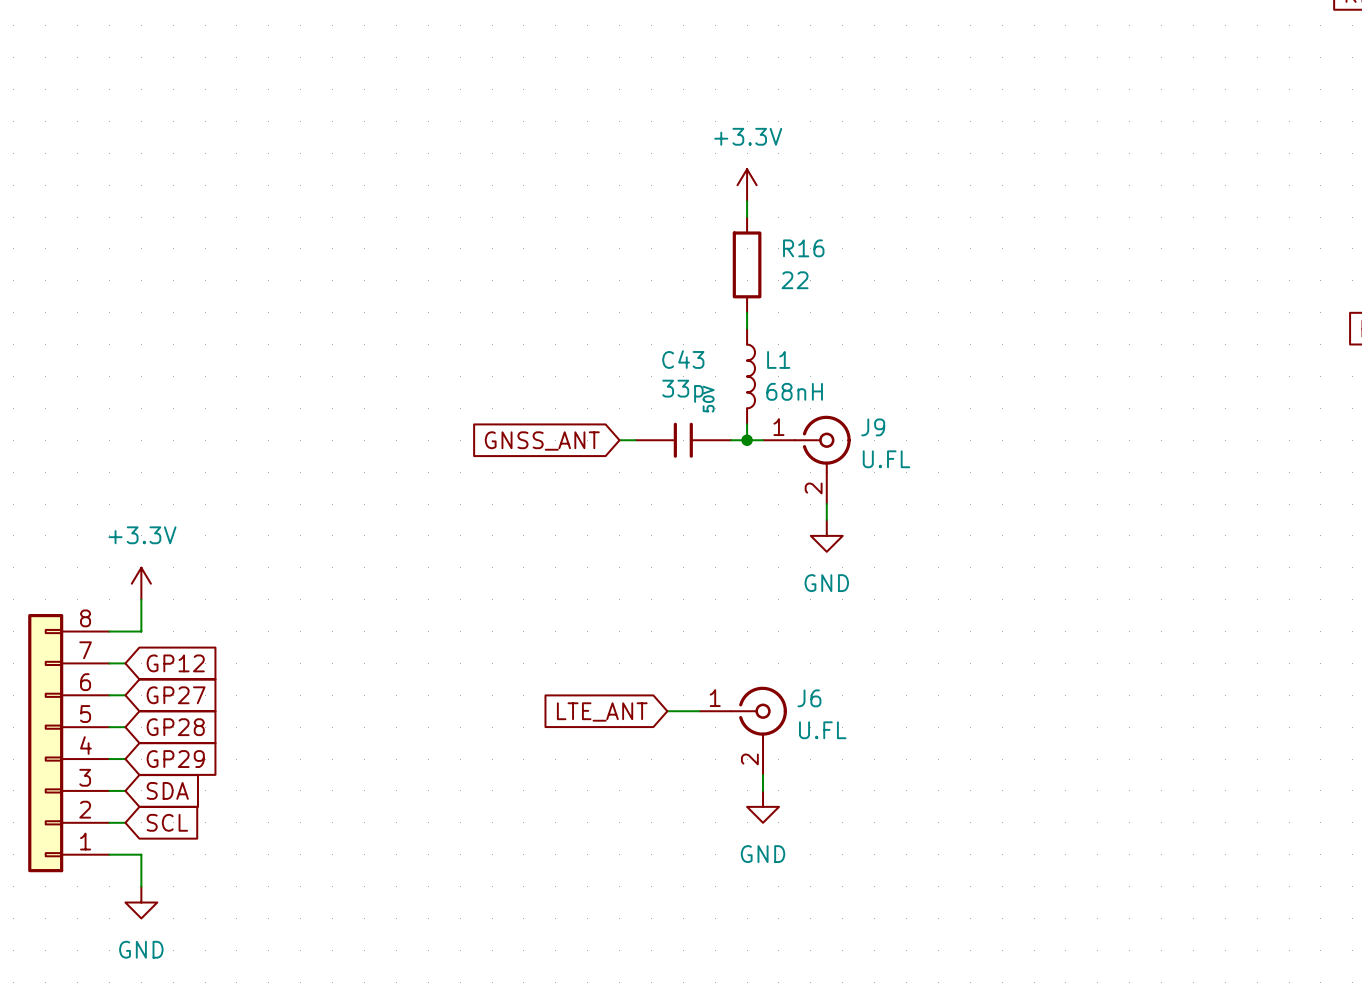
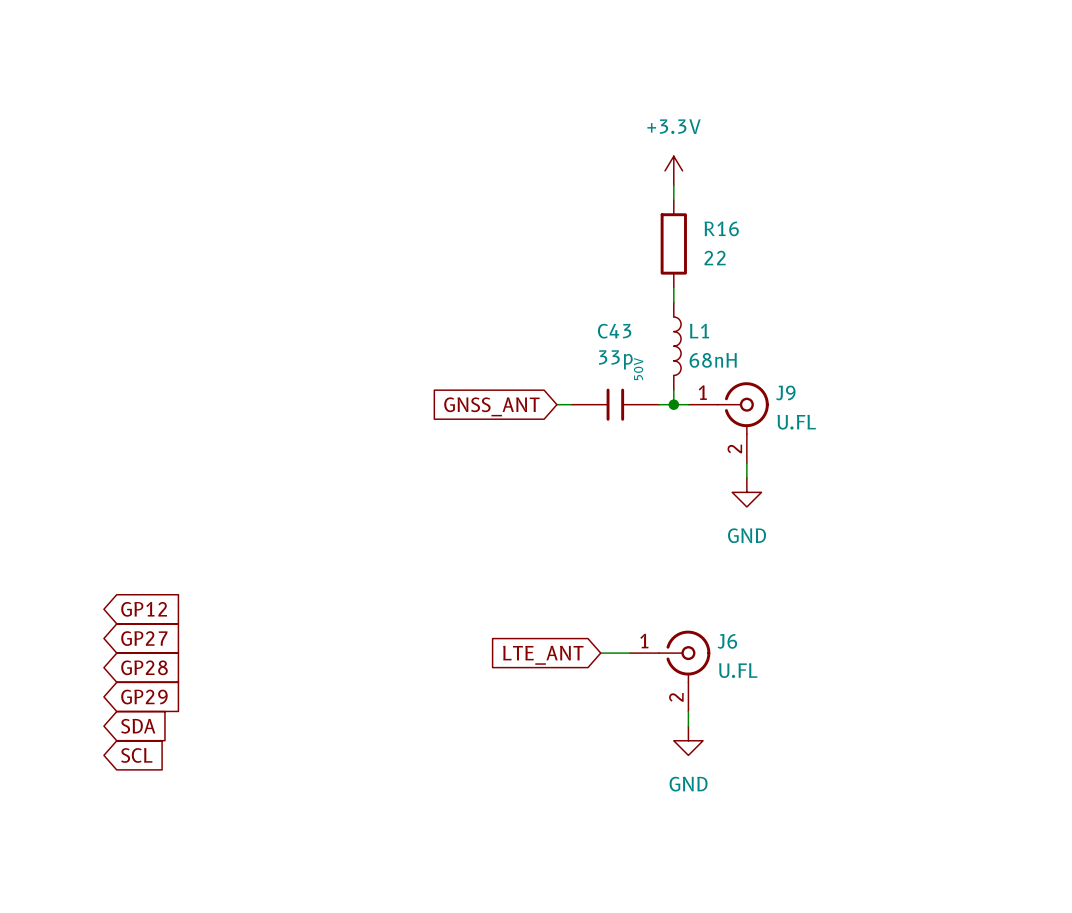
power symbol: +3.3V (141, 583) -> none
wire: (141, 599) (141, 631) (109, 631) -> none
wire: (109, 663) (125, 663) -> none
wire: (109, 695) (125, 695) -> none
wire: (109, 727) (125, 727) -> none
part: (68, 743) -> none
wire: (109, 759) (125, 759) -> none
wire: (109, 790) (125, 790) -> none
wire: (109, 822) (125, 822) -> none
wire: (109, 854) (141, 854) (141, 886) -> none
power symbol: GND (141, 902) -> none

